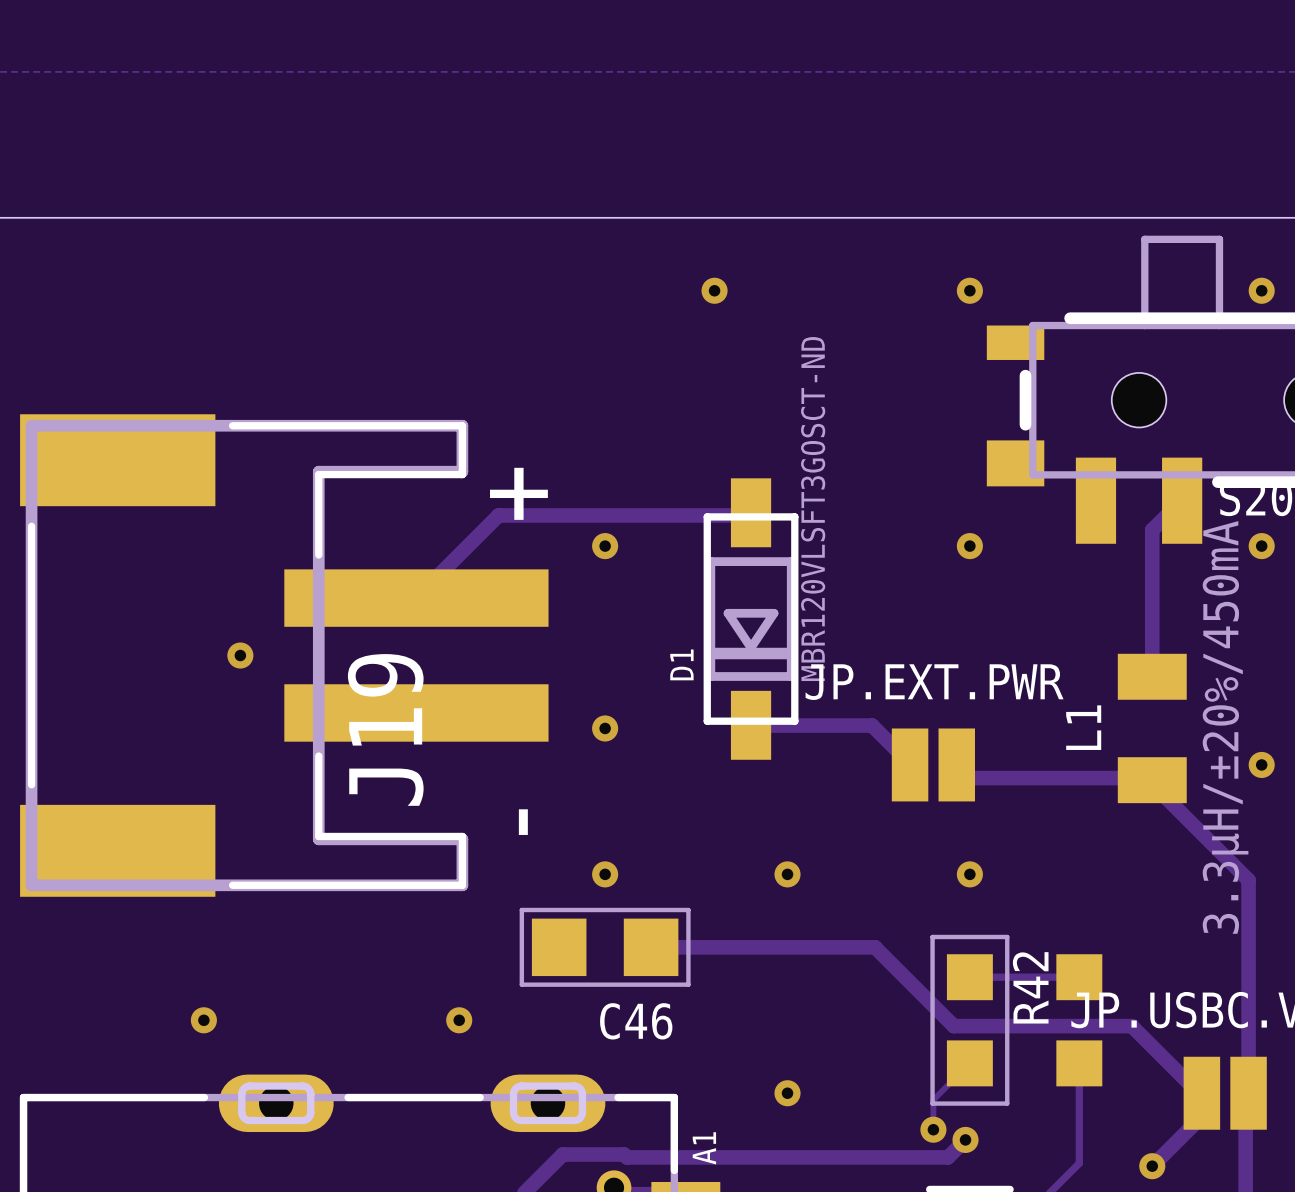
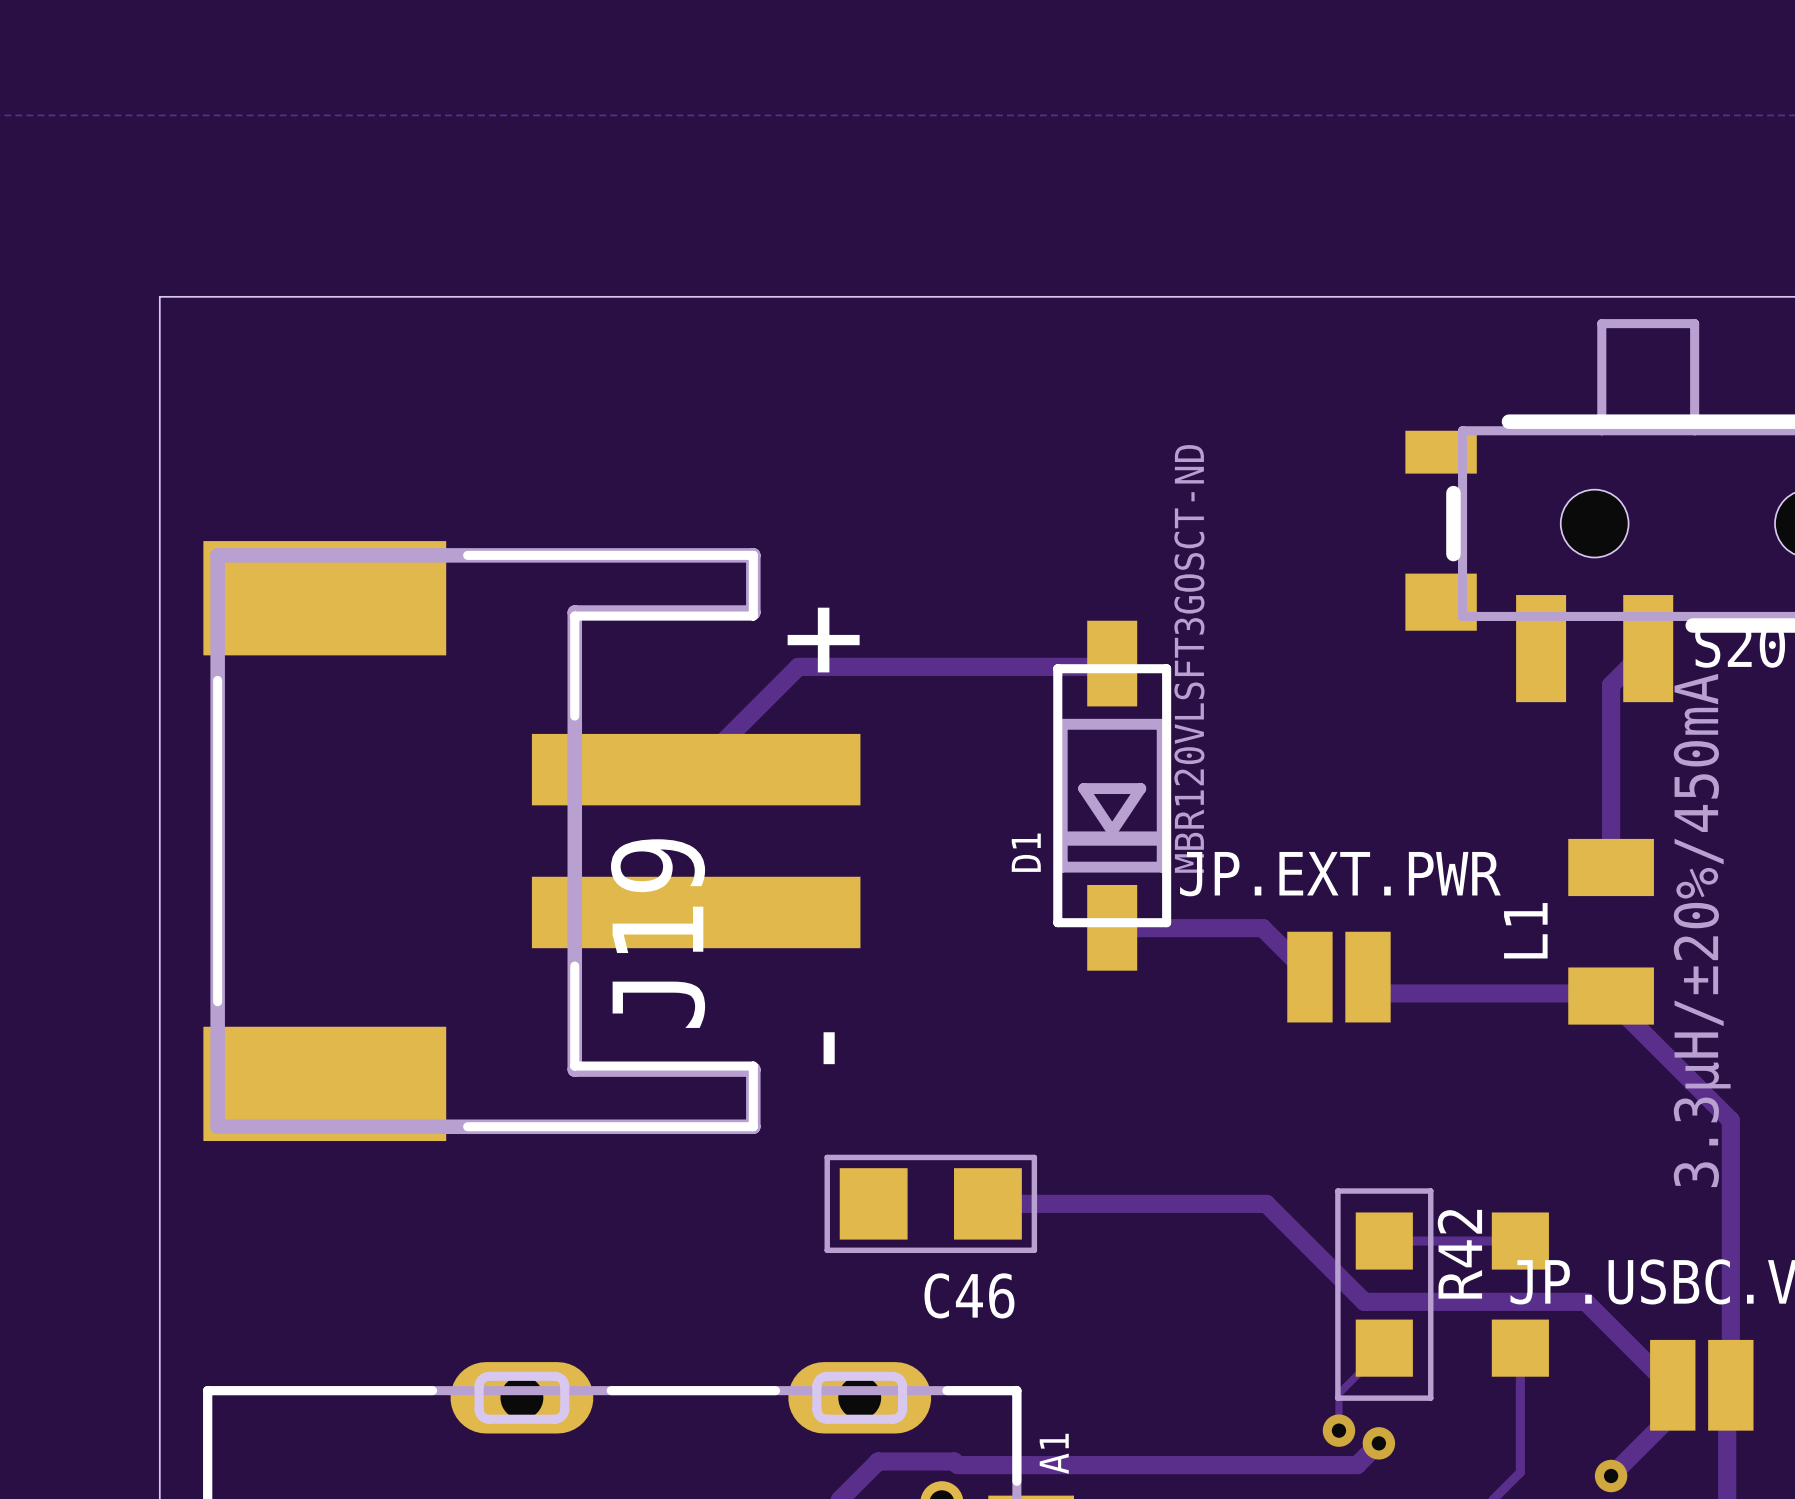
via: (714, 290) -> none
via: (969, 290) -> none
via: (1261, 290) -> none
via: (605, 546) -> none
via: (969, 546) -> none
via: (1261, 546) -> none
via: (240, 655) -> none
via: (605, 728) -> none
via: (1261, 764) -> none
via: (605, 874) -> none
via: (787, 874) -> none
via: (969, 874) -> none
via: (203, 1020) -> none
via: (459, 1020) -> none
via: (787, 1093) -> none

